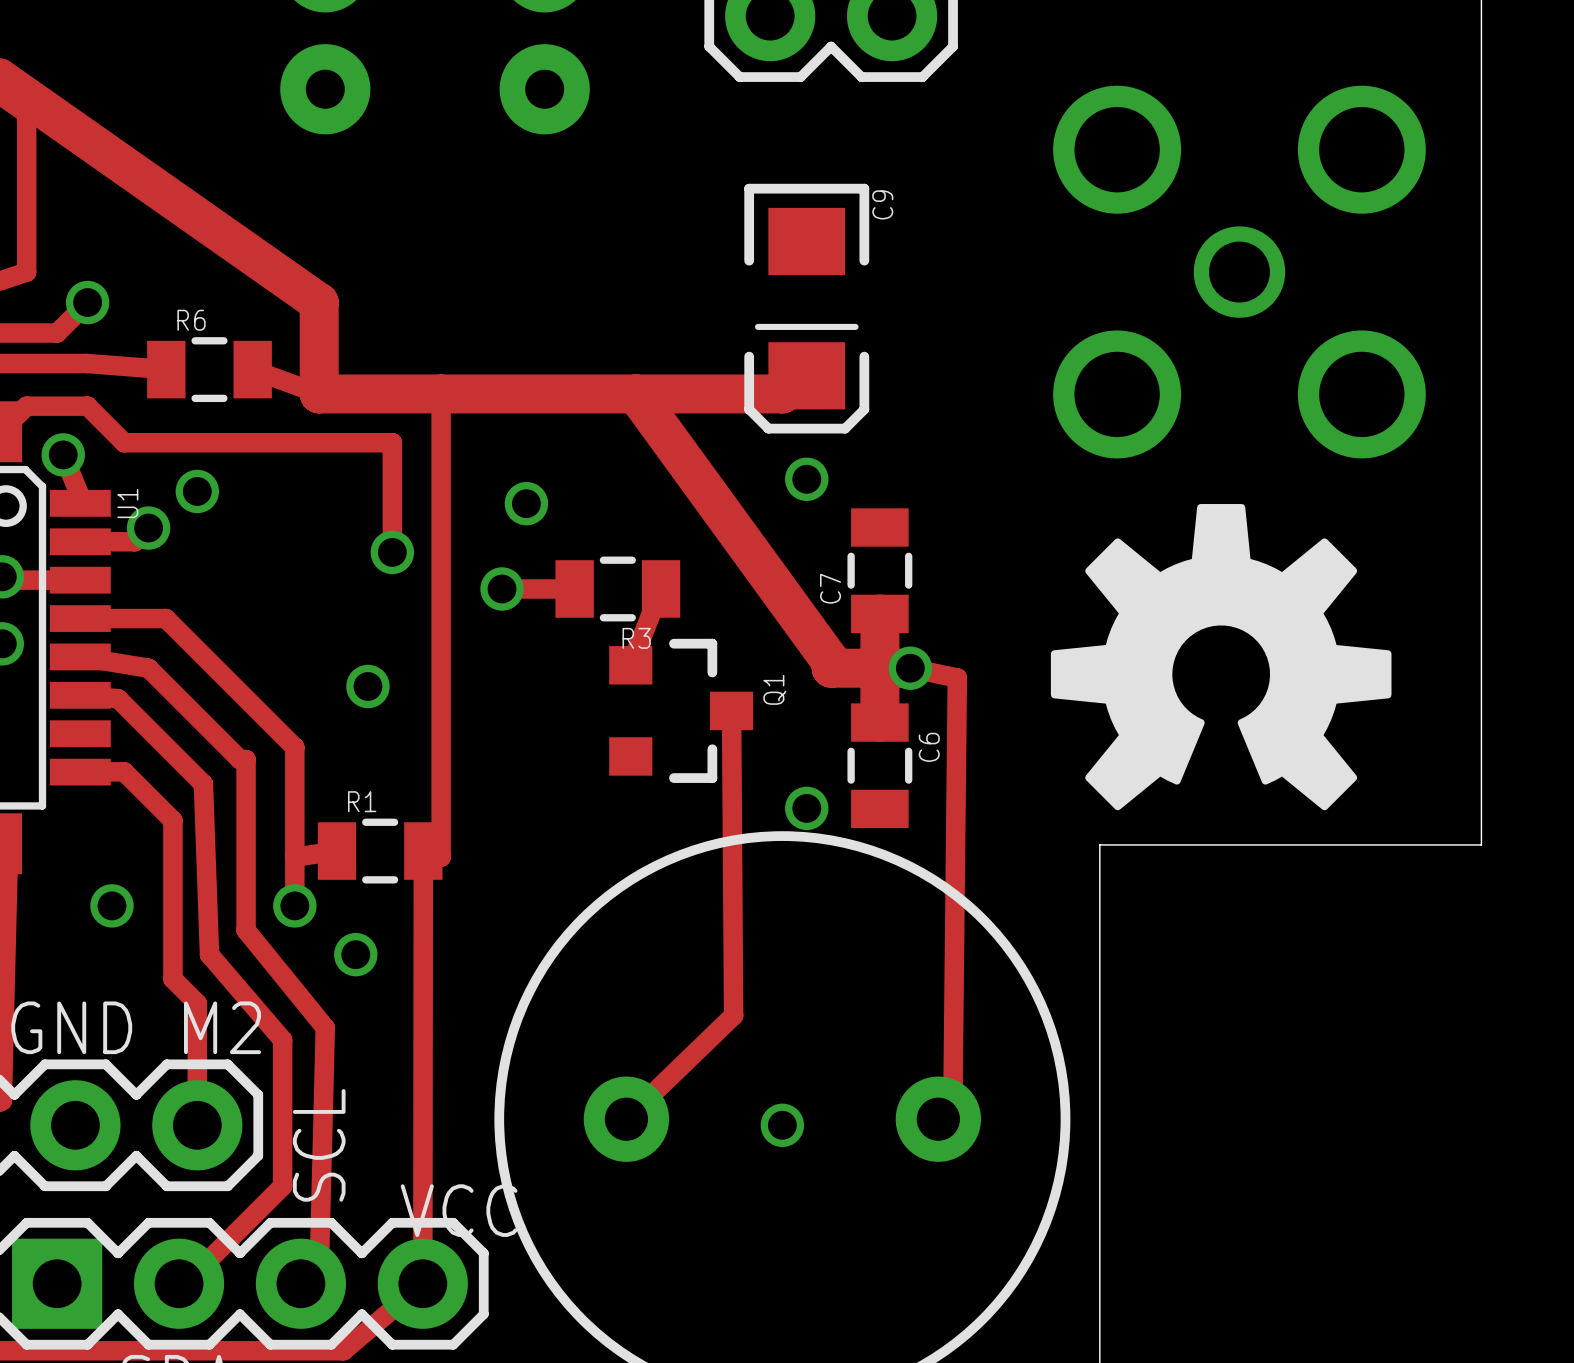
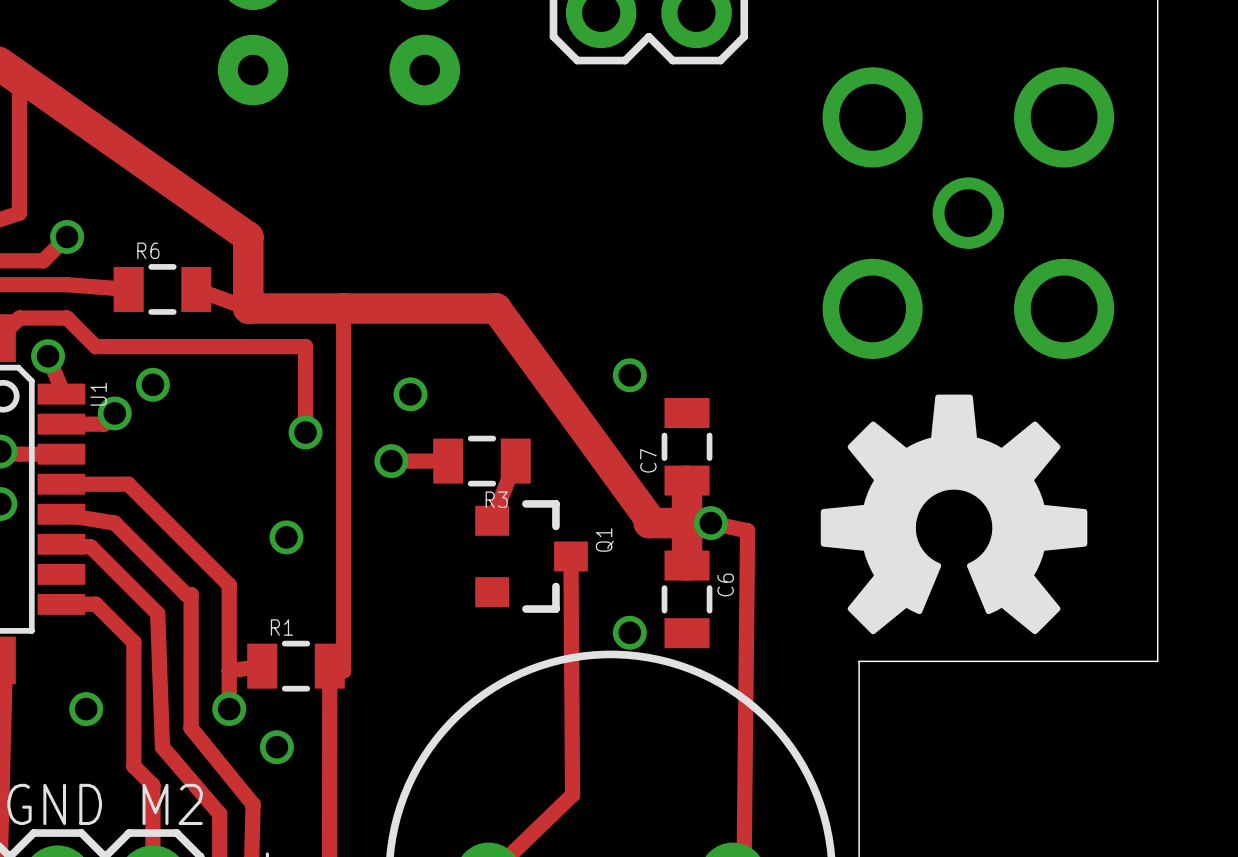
C9: (806, 308) -> none
track: (806, 375) (782, 393) (636, 393) -> none

